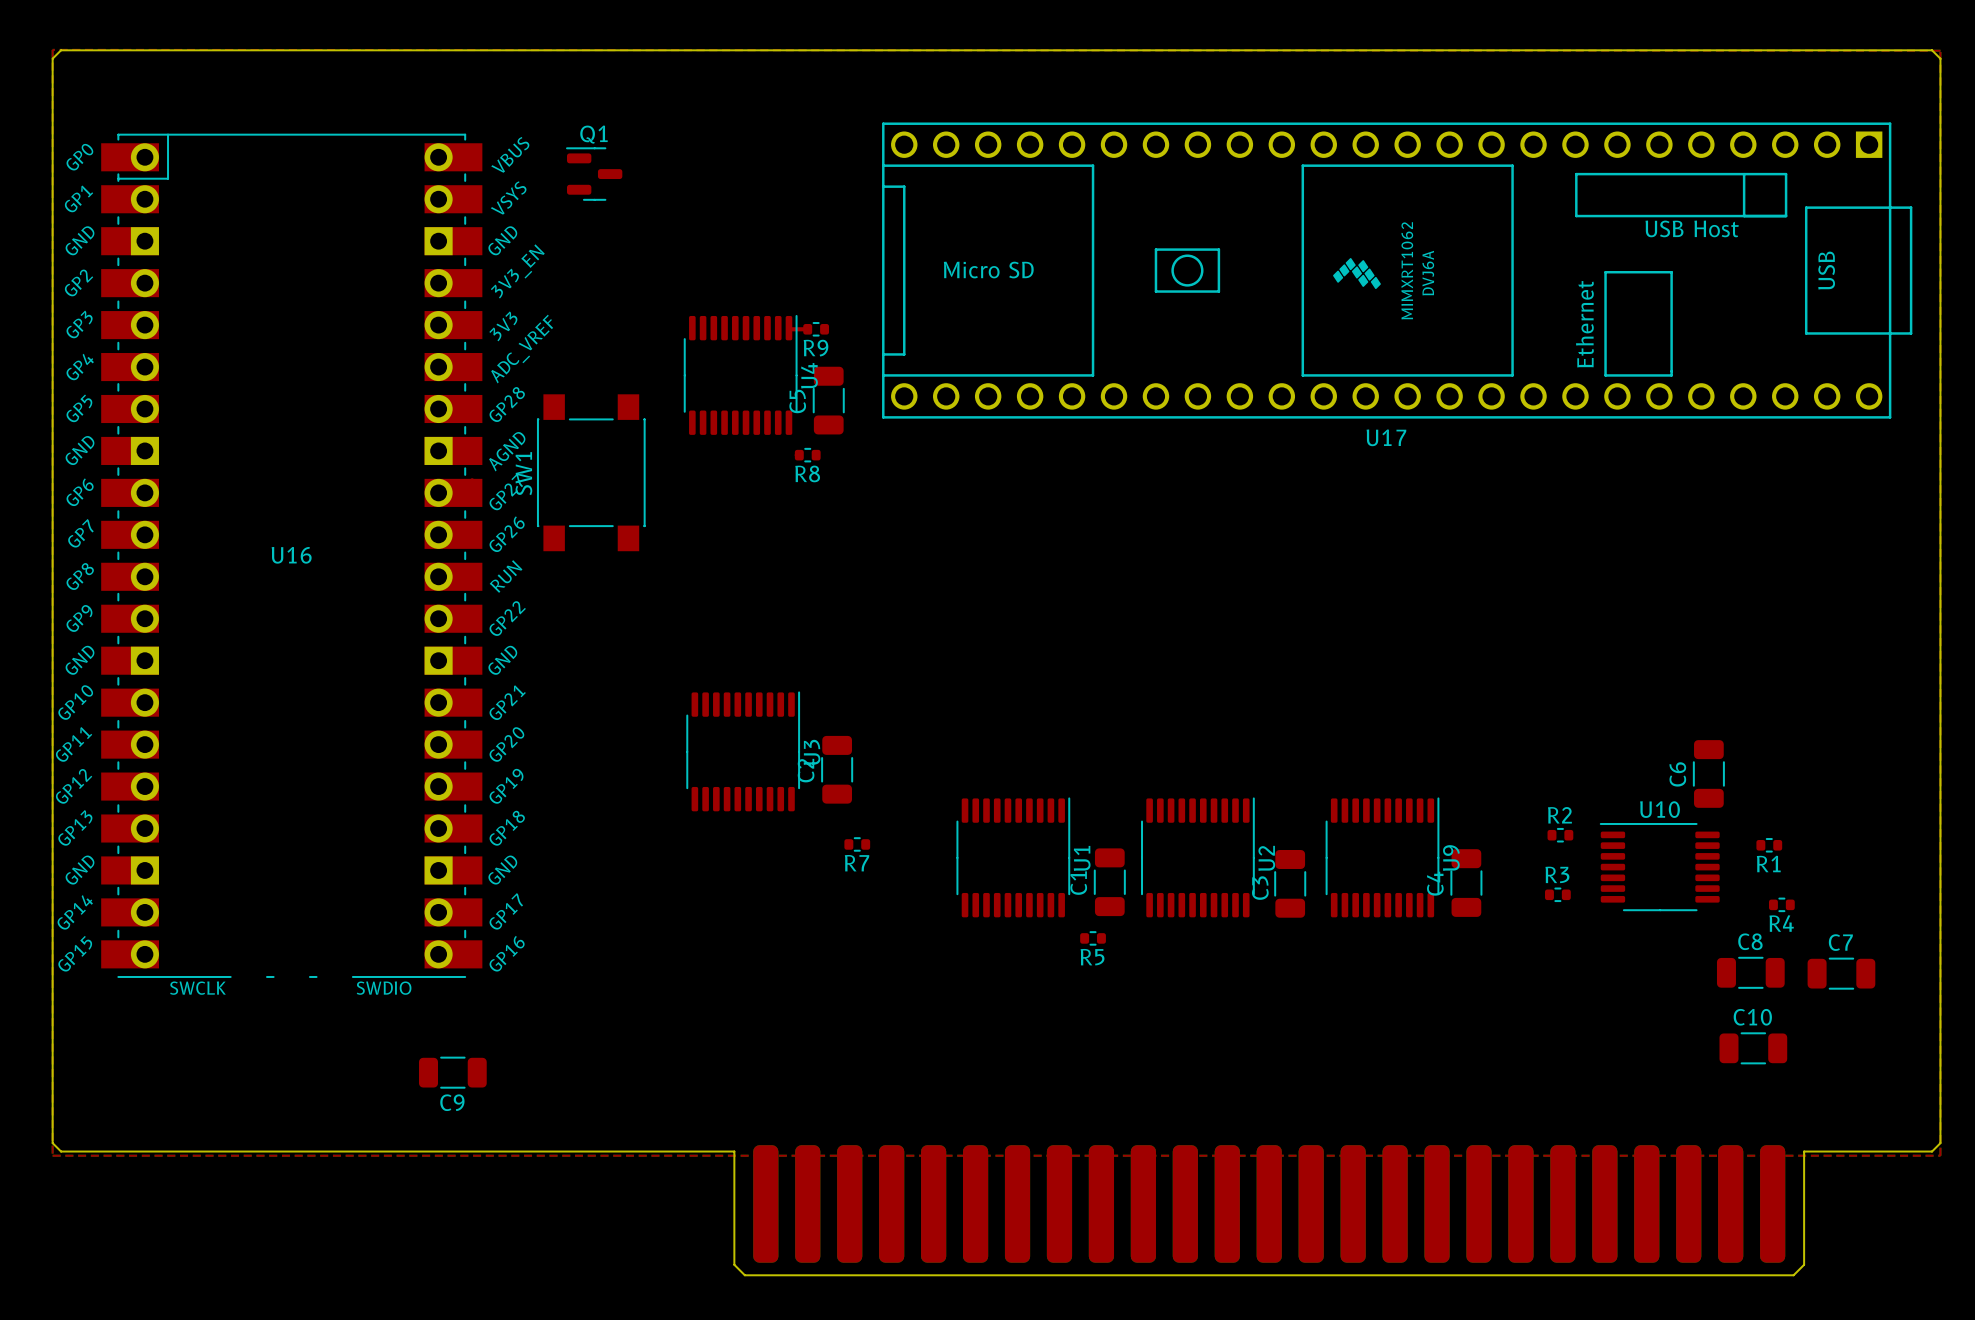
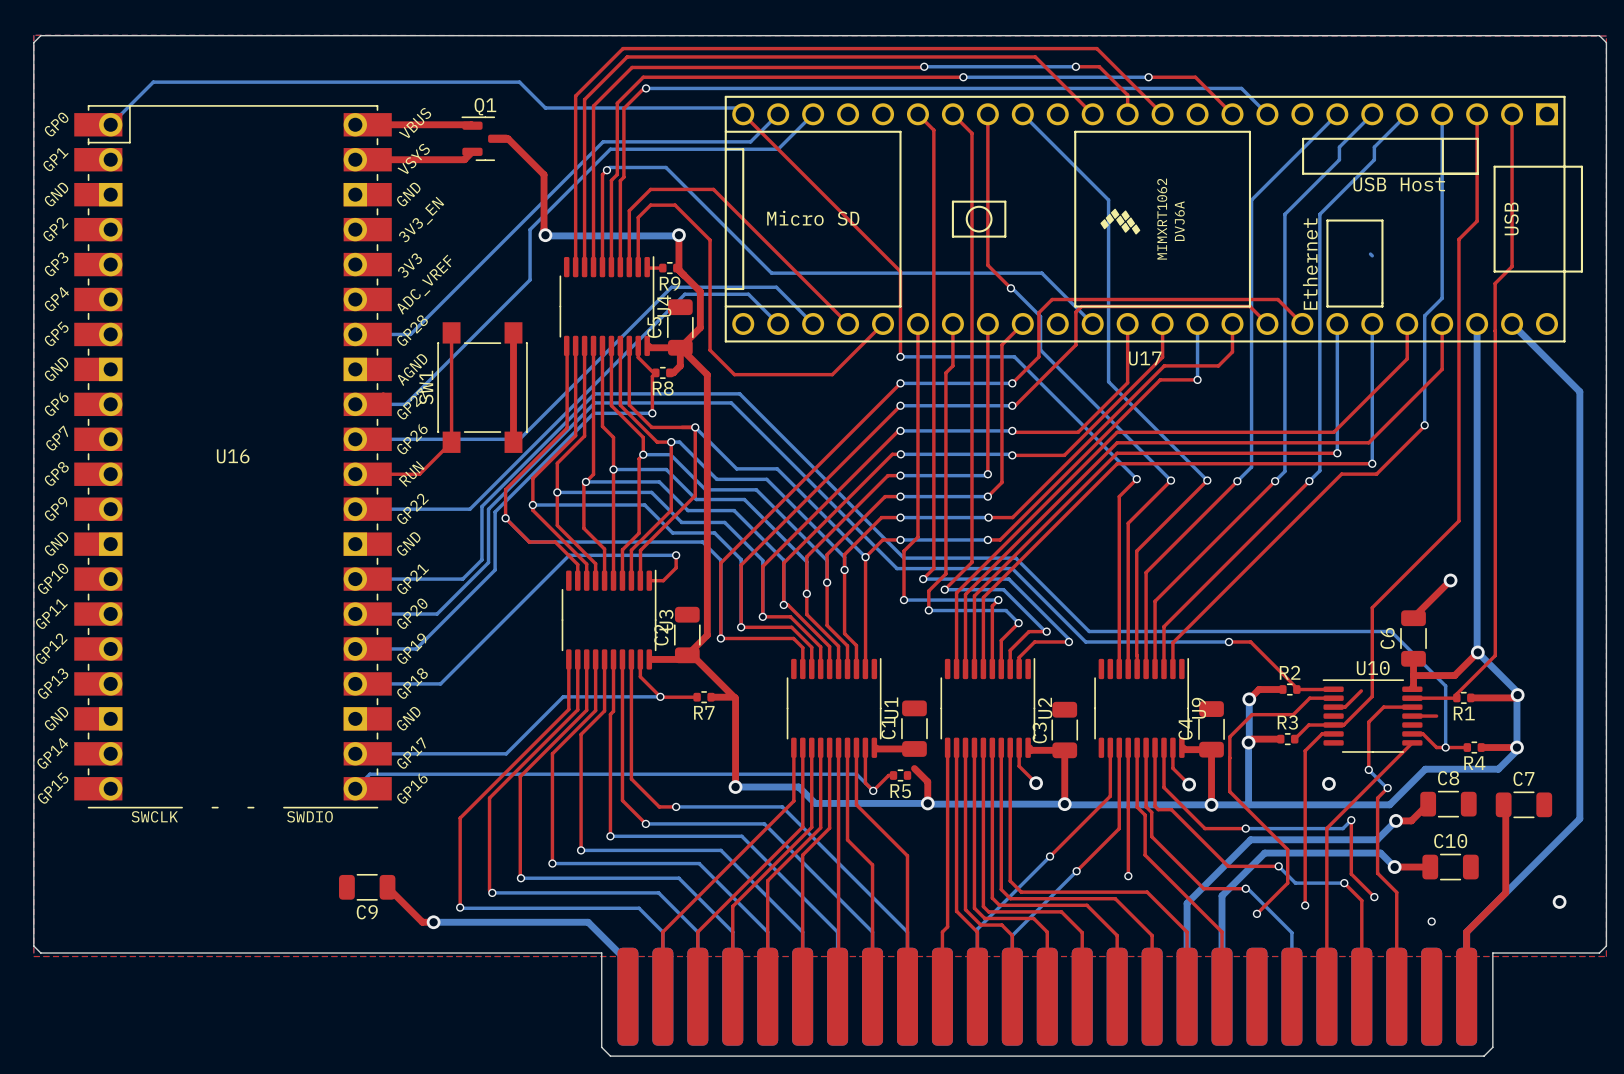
top track: none -> (924, 66) (632, 67) (593, 106) (593, 267)
bottom track: none -> (924, 66) (1075, 66)
via: none -> (924, 66)
top track: none -> (1075, 66) (1099, 66) (1127, 95) (1127, 114)
via: none -> (1075, 66)
top track: none -> (963, 77) (643, 77) (617, 103) (617, 174) (611, 180) (611, 267)
bottom track: none -> (963, 77) (1148, 77)
via: none -> (963, 77)
top track: none -> (1148, 77) (1195, 77) (1232, 114)
via: none -> (1148, 77)
top track: none -> (646, 88) (623, 108) (623, 177) (620, 180) (620, 267)
bottom track: none -> (646, 88) (1241, 88) (1267, 114)
via: none -> (646, 88)
top track: none -> (743, 114) (900, 271) (900, 356)
bottom track: none -> (743, 114) (736, 108) (545, 108) (519, 82) (153, 82) (110, 124)
bottom track: none -> (778, 114) (750, 141) (603, 141) (410, 334) (355, 334)
bottom track: none -> (813, 114) (778, 149) (610, 149) (530, 229) (530, 279) (405, 404) (355, 404)
top track: none -> (917, 114) (933, 130) (933, 568) (923, 579)
top track: none -> (952, 114) (971, 133) (971, 562) (944, 589)
top track: none -> (987, 114) (987, 265) (1010, 288)
bottom track: none -> (1022, 114) (1108, 200) (1108, 381) (1207, 480)
top track: none -> (1092, 114) (1035, 56) (627, 56) (584, 99) (584, 267)
top track: none -> (1162, 114) (1096, 48) (623, 48) (575, 95) (575, 267)
bottom track: none -> (1337, 114) (1251, 200) (1251, 467) (1237, 481)
bottom track: none -> (1372, 114) (1339, 147) (1339, 159) (1284, 214) (1284, 471) (1275, 481)
bottom track: none -> (1407, 114) (1374, 147) (1374, 159) (1319, 214) (1319, 470) (1309, 481)
bottom track: none -> (1442, 114) (1442, 298) (1424, 315) (1424, 425)
top track: none -> (1477, 114) (1477, 221) (1458, 239) (1458, 521) (1372, 607) (1372, 696) (1343, 725) (1308, 725) (1294, 739)
top track: none -> (1512, 114) (1512, 266) (1495, 283) (1495, 330)
top track: none -> (355, 124) (472, 125)
top track: none -> (498, 138) (508, 138) (544, 174) (545, 235)
top track: none -> (472, 151) (464, 159) (355, 159)
top track: none -> (606, 170) (602, 174) (602, 267)
bottom track: none -> (606, 170) (609, 167) (665, 167) (771, 273) (1041, 273) (1092, 323)
via: none -> (606, 170)
bottom track: none -> (545, 235) (678, 235)
via: none -> (545, 235)
top track: none -> (678, 235) (678, 270)
via: none -> (678, 235)
bottom track: none -> (1370, 254) (1372, 255)
top track: none -> (629, 267) (629, 210) (650, 189) (713, 189) (848, 323)
top track: none -> (638, 267) (638, 217) (650, 205) (675, 205) (710, 240) (710, 350) (734, 374) (832, 374) (883, 323)
top track: none -> (676, 268) (700, 291) (700, 327) (680, 347)
bottom track: none -> (1011, 287) (1040, 316) (1040, 350) (1170, 480)
via: none -> (1010, 288)
bottom track: none -> (778, 323) (748, 294) (684, 294) (469, 509) (355, 509)
bottom track: none -> (813, 323) (776, 287) (671, 287) (519, 439) (355, 439)
top track: none -> (917, 323) (917, 537) (903, 551) (903, 600)
top track: none -> (952, 323) (952, 365) (945, 372) (945, 573) (928, 590) (928, 610)
top track: none -> (987, 323) (987, 474)
top track: none -> (1022, 323) (1001, 344) (1001, 482) (987, 496)
top track: none -> (1127, 323) (1127, 382) (1078, 432) (1012, 430)
top track: none -> (1162, 323) (1162, 357) (1064, 455) (1012, 455)
bottom track: none -> (1197, 323) (1197, 379)
top track: none -> (1232, 323) (1232, 351) (1218, 365) (1164, 365) (1012, 517) (988, 517)
top track: none -> (1267, 323) (1249, 306) (1081, 306) (1075, 312) (1075, 344) (1015, 405) (1012, 405)
top track: none -> (1302, 323) (1277, 299) (1052, 299) (1038, 312) (1038, 356) (1012, 383)
bottom track: none -> (1337, 323) (1337, 453)
bottom track: none -> (1372, 323) (1372, 463)
top track: none -> (1407, 323) (1407, 358) (1333, 432) (1117, 432) (956, 592) (956, 669)
top track: none -> (1442, 323) (1442, 369) (1368, 442) (1117, 442) (965, 594) (965, 669)
bottom track: none -> (1477, 323) (1477, 651) (1517, 692) (1516, 750) (1498, 769) (1425, 769) (1389, 804) (815, 803) (798, 787) (735, 787)
bottom track: none -> (1512, 323) (1579, 391) (1579, 818) (1466, 932) (1466, 996)
top track: none -> (1495, 331) (1495, 655) (1456, 694) (1456, 698) (1412, 698)
top track: none -> (451, 332) (451, 442) (419, 474) (355, 474)
top track: none -> (513, 332) (513, 442)
top track: none -> (566, 345) (567, 428) (505, 489) (505, 518) (529, 542) (555, 542) (577, 564) (577, 580)
top track: none -> (575, 345) (575, 435) (532, 478) (532, 510) (586, 564) (586, 580)
top track: none -> (584, 345) (584, 436) (557, 463) (557, 525) (595, 563) (595, 580)
top track: none -> (593, 345) (593, 474) (583, 484) (583, 528) (604, 549) (604, 580)
top track: none -> (602, 345) (602, 426) (613, 437) (613, 580)
top track: none -> (611, 345) (611, 405) (643, 437) (643, 454) (639, 458) (639, 533) (622, 549) (622, 580)
top track: none -> (620, 345) (620, 405) (657, 442) (671, 442) (671, 510) (631, 550) (631, 580)
top track: none -> (629, 345) (629, 404) (651, 427) (695, 427) (695, 495) (640, 550) (640, 580)
top track: none -> (638, 345) (638, 357) (653, 372)
top track: none -> (648, 345) (649, 347) (680, 347)
top track: none -> (680, 347) (680, 365) (673, 372) (669, 372)
top track: none -> (680, 347) (707, 374) (707, 635) (683, 659) (650, 659)
bottom track: none -> (899, 356) (1014, 356) (1136, 479)
via: none -> (900, 356)
top track: none -> (655, 372) (652, 376) (652, 413)
top track: none -> (1197, 379) (1160, 379) (1000, 539) (987, 539)
via: none -> (1197, 379)
top track: none -> (900, 383) (720, 563) (720, 638) (793, 638) (802, 647) (802, 669)
bottom track: none -> (900, 383) (1012, 383)
via: none -> (900, 383)
via: none -> (1012, 383)
top track: none -> (900, 405) (741, 565) (741, 627) (791, 627) (811, 647) (811, 669)
bottom track: none -> (900, 405) (1012, 405)
via: none -> (900, 405)
via: none -> (1012, 405)
bottom track: none -> (652, 413) (593, 413) (495, 511) (495, 570) (416, 648) (355, 648)
via: none -> (652, 413)
top track: none -> (1424, 425) (1376, 474) (1341, 474) (1172, 642) (1172, 669)
via: none -> (1424, 425)
bottom track: none -> (695, 427) (736, 468) (777, 468) (865, 557)
via: none -> (695, 427)
top track: none -> (900, 430) (762, 566) (762, 616) (790, 616) (820, 646) (820, 669)
bottom track: none -> (900, 430) (1012, 430)
via: none -> (900, 430)
via: none -> (1012, 430)
bottom track: none -> (671, 442) (679, 442) (716, 479) (766, 479) (844, 557) (844, 570)
via: none -> (671, 442)
top track: none -> (1337, 453) (1117, 453) (974, 595) (974, 669)
via: none -> (1337, 453)
top track: none -> (900, 454) (892, 454) (783, 563) (783, 604) (787, 604) (829, 646) (829, 669)
bottom track: none -> (900, 454) (1012, 455)
via: none -> (900, 454)
bottom track: none -> (643, 454) (670, 454) (705, 489) (756, 489) (827, 560) (827, 582)
via: none -> (643, 454)
via: none -> (1012, 455)
top track: none -> (1372, 463) (1117, 463) (983, 597) (983, 669)
via: none -> (1372, 463)
bottom track: none -> (613, 469) (666, 469) (696, 499) (744, 499) (806, 561) (806, 593)
via: none -> (613, 469)
bottom track: none -> (987, 474) (900, 475)
via: none -> (987, 474)
top track: none -> (900, 475) (887, 475) (806, 556) (806, 614) (838, 646) (838, 669)
via: none -> (900, 475)
top track: none -> (1136, 479) (1119, 496) (1119, 669)
via: none -> (1136, 479)
top track: none -> (1170, 480) (1128, 523) (1128, 669)
via: none -> (1170, 480)
top track: none -> (1207, 480) (1136, 551) (1137, 669)
via: none -> (1207, 480)
top track: none -> (1237, 481) (1146, 572) (1146, 669)
via: none -> (1237, 481)
top track: none -> (1275, 481) (1155, 601) (1155, 669)
via: none -> (1275, 481)
top track: none -> (1309, 481) (1163, 626) (1163, 669)
via: none -> (1309, 481)
bottom track: none -> (585, 481) (659, 481) (688, 510) (734, 510) (783, 560) (783, 604)
via: none -> (585, 481)
bottom track: none -> (557, 492) (651, 492) (681, 522) (724, 522) (762, 560) (762, 616)
via: none -> (557, 492)
top track: none -> (900, 496) (885, 496) (827, 554) (827, 625) (847, 645) (847, 669)
bottom track: none -> (900, 496) (987, 496)
via: none -> (900, 496)
via: none -> (987, 496)
bottom track: none -> (532, 505) (644, 505) (672, 532) (714, 532) (741, 559) (741, 627)
via: none -> (532, 505)
top track: none -> (900, 517) (881, 517) (844, 554) (844, 633) (856, 645) (856, 669)
bottom track: none -> (900, 517) (988, 517)
via: none -> (900, 517)
via: none -> (988, 517)
bottom track: none -> (505, 518) (529, 542) (702, 542) (720, 560) (720, 638)
via: none -> (505, 518)
top track: none -> (900, 539) (882, 539) (865, 557) (865, 668)
bottom track: none -> (900, 539) (987, 539)
via: none -> (900, 539)
via: none -> (987, 539)
top track: none -> (676, 555) (676, 567) (663, 580) (649, 580)
bottom track: none -> (676, 555) (569, 555) (440, 683) (355, 683)
via: none -> (676, 555)
via: none -> (865, 557)
via: none -> (844, 570)
bottom track: none -> (355, 579) (462, 579) (481, 559) (481, 506) (594, 393) (739, 393) (903, 558) (1015, 558) (1089, 631) (1391, 631) (1445, 686) (1445, 747)
bottom track: none -> (923, 579) (1008, 579) (1068, 639) (1068, 641)
via: none -> (923, 579)
top track: none -> (1450, 580) (1413, 618)
via: none -> (1450, 580)
via: none -> (827, 582)
bottom track: none -> (944, 589) (1003, 589) (1046, 631)
via: none -> (944, 589)
via: none -> (806, 593)
bottom track: none -> (903, 600) (998, 600)
via: none -> (903, 600)
top track: none -> (998, 600) (992, 606) (992, 669)
via: none -> (998, 600)
via: none -> (783, 604)
bottom track: none -> (928, 610) (1006, 610) (1018, 623)
via: none -> (928, 610)
bottom track: none -> (355, 614) (437, 614) (488, 562) (488, 509) (594, 402) (731, 402) (897, 568) (1012, 568) (1085, 641) (1229, 641) (1227, 643)
via: none -> (762, 616)
top track: none -> (1018, 623) (1001, 640) (1001, 669)
via: none -> (1018, 623)
via: none -> (741, 627)
top track: none -> (1046, 631) (1028, 631) (1010, 650) (1010, 669)
via: none -> (1046, 631)
via: none -> (720, 638)
top track: none -> (1068, 641) (1034, 641) (1019, 657) (1019, 669)
via: none -> (1068, 641)
top track: none -> (1229, 641) (1250, 641) (1296, 689) (1333, 689)
via: none -> (1229, 641)
top track: none -> (1477, 652) (1454, 675) (1413, 675)
via: none -> (1477, 652)
top track: none -> (687, 655) (692, 655) (735, 698) (735, 787)
top track: none -> (1413, 658) (1412, 687)
top track: none -> (568, 659) (568, 709) (460, 818) (460, 907)
top track: none -> (577, 659) (577, 709) (489, 798) (489, 890) (492, 892)
top track: none -> (586, 659) (586, 710) (520, 776) (520, 878)
top track: none -> (595, 659) (595, 710) (552, 753) (552, 863)
top track: none -> (604, 659) (604, 710) (581, 734) (581, 850)
top track: none -> (613, 659) (613, 711) (610, 714) (610, 836)
top track: none -> (622, 659) (622, 800) (645, 823)
top track: none -> (631, 659) (631, 778) (659, 806) (676, 806)
top track: none -> (640, 659) (640, 676) (660, 697) (697, 697)
top track: none -> (1282, 689) (1259, 689) (1249, 699)
top track: none -> (1361, 690) (1345, 707) (1333, 707)
top track: none -> (1517, 695) (1514, 697) (1470, 697)
via: none -> (1517, 695)
bottom track: none -> (660, 696) (563, 696) (506, 753) (355, 753)
via: none -> (660, 696)
top track: none -> (711, 697) (734, 697)
top track: none -> (1333, 698) (1309, 698) (1293, 714) (1252, 714) (1229, 736) (1229, 757)
bottom track: none -> (1249, 699) (1249, 804)
via: none -> (1249, 699)
top track: none -> (1412, 707) (1383, 707) (1368, 722) (1368, 769)
top track: none -> (1412, 716) (1436, 716)
top track: none -> (1333, 733) (1322, 733) (1305, 750) (1305, 905)
top track: none -> (1412, 733) (1423, 733) (1436, 747) (1467, 747)
top track: none -> (1280, 739) (1252, 739) (1248, 742)
via: none -> (1248, 742)
top track: none -> (1412, 742) (1326, 828) (1326, 996)
via: none -> (1445, 747)
top track: none -> (1481, 747) (1516, 747)
via: none -> (1516, 747)
top track: none -> (793, 747) (793, 801) (662, 932) (662, 996)
top track: none -> (802, 747) (802, 827) (697, 932) (697, 996)
top track: none -> (811, 747) (811, 827) (732, 906) (732, 996)
top track: none -> (820, 747) (820, 827) (767, 880) (767, 996)
top track: none -> (829, 747) (829, 828) (802, 855) (802, 996)
top track: none -> (838, 747) (837, 996)
top track: none -> (847, 747) (847, 839) (872, 864) (872, 996)
top track: none -> (856, 747) (856, 804) (907, 855) (907, 996)
top track: none -> (865, 747) (865, 783) (873, 790) (888, 775) (893, 775)
top track: none -> (875, 747) (910, 748)
top track: none -> (947, 747) (947, 926) (942, 932) (942, 996)
top track: none -> (956, 747) (956, 911) (977, 932) (977, 996)
top track: none -> (965, 747) (965, 909) (980, 925) (1001, 925) (1012, 935) (1012, 996)
top track: none -> (974, 747) (974, 908) (984, 918) (1033, 918) (1047, 932) (1047, 996)
top track: none -> (983, 747) (983, 906) (988, 911) (1061, 911) (1082, 932) (1082, 996)
top track: none -> (992, 747) (992, 898) (999, 905) (1086, 905) (1117, 935) (1117, 996)
top track: none -> (1001, 747) (1001, 889) (1010, 898) (1115, 898) (1152, 935) (1152, 996)
top track: none -> (1010, 747) (1010, 881) (1021, 892) (1147, 892) (1187, 932) (1187, 996)
top track: none -> (1019, 747) (1019, 766) (1036, 783)
top track: none -> (1029, 747) (1030, 750) (1064, 750) (1064, 804)
top track: none -> (1110, 747) (1110, 796) (1050, 856)
top track: none -> (1119, 747) (1119, 828) (1076, 871)
top track: none -> (1128, 747) (1128, 807)
top track: none -> (1137, 747) (1137, 807) (1145, 815) (1145, 855) (1222, 932) (1222, 996)
top track: none -> (1146, 747) (1146, 806) (1151, 812) (1151, 836) (1203, 888) (1245, 888)
top track: none -> (1155, 747) (1155, 806) (1158, 809) (1171, 809) (1228, 866) (1278, 866)
top track: none -> (1163, 747) (1163, 787) (1205, 828) (1245, 828)
top track: none -> (1172, 747) (1172, 768) (1189, 784)
top track: none -> (1183, 747) (1183, 749) (1211, 749) (1211, 804)
top track: none -> (1229, 758) (1229, 791) (1287, 849) (1287, 883) (1256, 913)
top track: none -> (914, 768) (927, 781) (927, 803)
bottom track: none -> (1368, 769) (1387, 788)
via: none -> (1368, 769)
via: none -> (1036, 783)
via: none -> (1328, 783)
via: none -> (1189, 784)
via: none -> (735, 787)
top track: none -> (1387, 788) (1377, 798) (1377, 873) (1396, 892) (1396, 996)
via: none -> (1387, 788)
bottom track: none -> (355, 788) (369, 774) (856, 774) (873, 790)
via: none -> (873, 790)
via: none -> (927, 803)
via: none -> (1064, 804)
top track: none -> (1428, 804) (1411, 820) (1396, 820)
via: none -> (1211, 804)
top track: none -> (1503, 804) (1505, 806) (1505, 892) (1466, 932) (1466, 996)
bottom track: none -> (676, 806) (782, 806) (907, 932) (907, 996)
via: none -> (676, 806)
top track: none -> (1128, 807) (1128, 876)
top track: none -> (1351, 820) (1351, 874) (1374, 897)
bottom track: none -> (1351, 820) (1342, 828) (1245, 828)
via: none -> (1351, 820)
bottom track: none -> (1396, 820) (1377, 839) (1250, 839) (1187, 903) (1187, 996)
via: none -> (1396, 820)
bottom track: none -> (645, 823) (764, 823) (872, 932) (872, 996)
via: none -> (645, 823)
via: none -> (1245, 828)
bottom track: none -> (610, 836) (741, 836) (837, 932) (837, 996)
via: none -> (610, 836)
bottom track: none -> (581, 850) (721, 850) (802, 932) (802, 996)
via: none -> (581, 850)
bottom track: none -> (1050, 856) (977, 929) (977, 996)
via: none -> (1050, 856)
bottom track: none -> (552, 863) (699, 863) (767, 932) (767, 996)
via: none -> (552, 863)
bottom track: none -> (1278, 866) (1295, 883) (1344, 883)
via: none -> (1278, 866)
top track: none -> (1394, 867) (1430, 867)
bottom track: none -> (1394, 867) (1380, 853) (1264, 853) (1222, 895) (1222, 996)
via: none -> (1394, 867)
bottom track: none -> (1076, 871) (1012, 935) (1012, 996)
via: none -> (1076, 871)
via: none -> (1128, 876)
bottom track: none -> (520, 878) (678, 878) (732, 932) (732, 996)
via: none -> (520, 878)
top track: none -> (1344, 883) (1361, 900) (1361, 996)
via: none -> (1344, 883)
top track: none -> (387, 887) (422, 922) (433, 922)
bottom track: none -> (1245, 888) (1291, 932) (1291, 996)
via: none -> (1245, 888)
bottom track: none -> (492, 892) (658, 892) (697, 932) (697, 996)
via: none -> (492, 892)
via: none -> (1374, 897)
via: none -> (1559, 901)
via: none -> (1305, 905)
bottom track: none -> (460, 907) (639, 908) (662, 932) (662, 996)
via: none -> (460, 907)
via: none -> (1256, 913)
via: none -> (1431, 921)
bottom track: none -> (432, 922) (588, 922) (627, 962) (627, 996)
via: none -> (433, 922)

